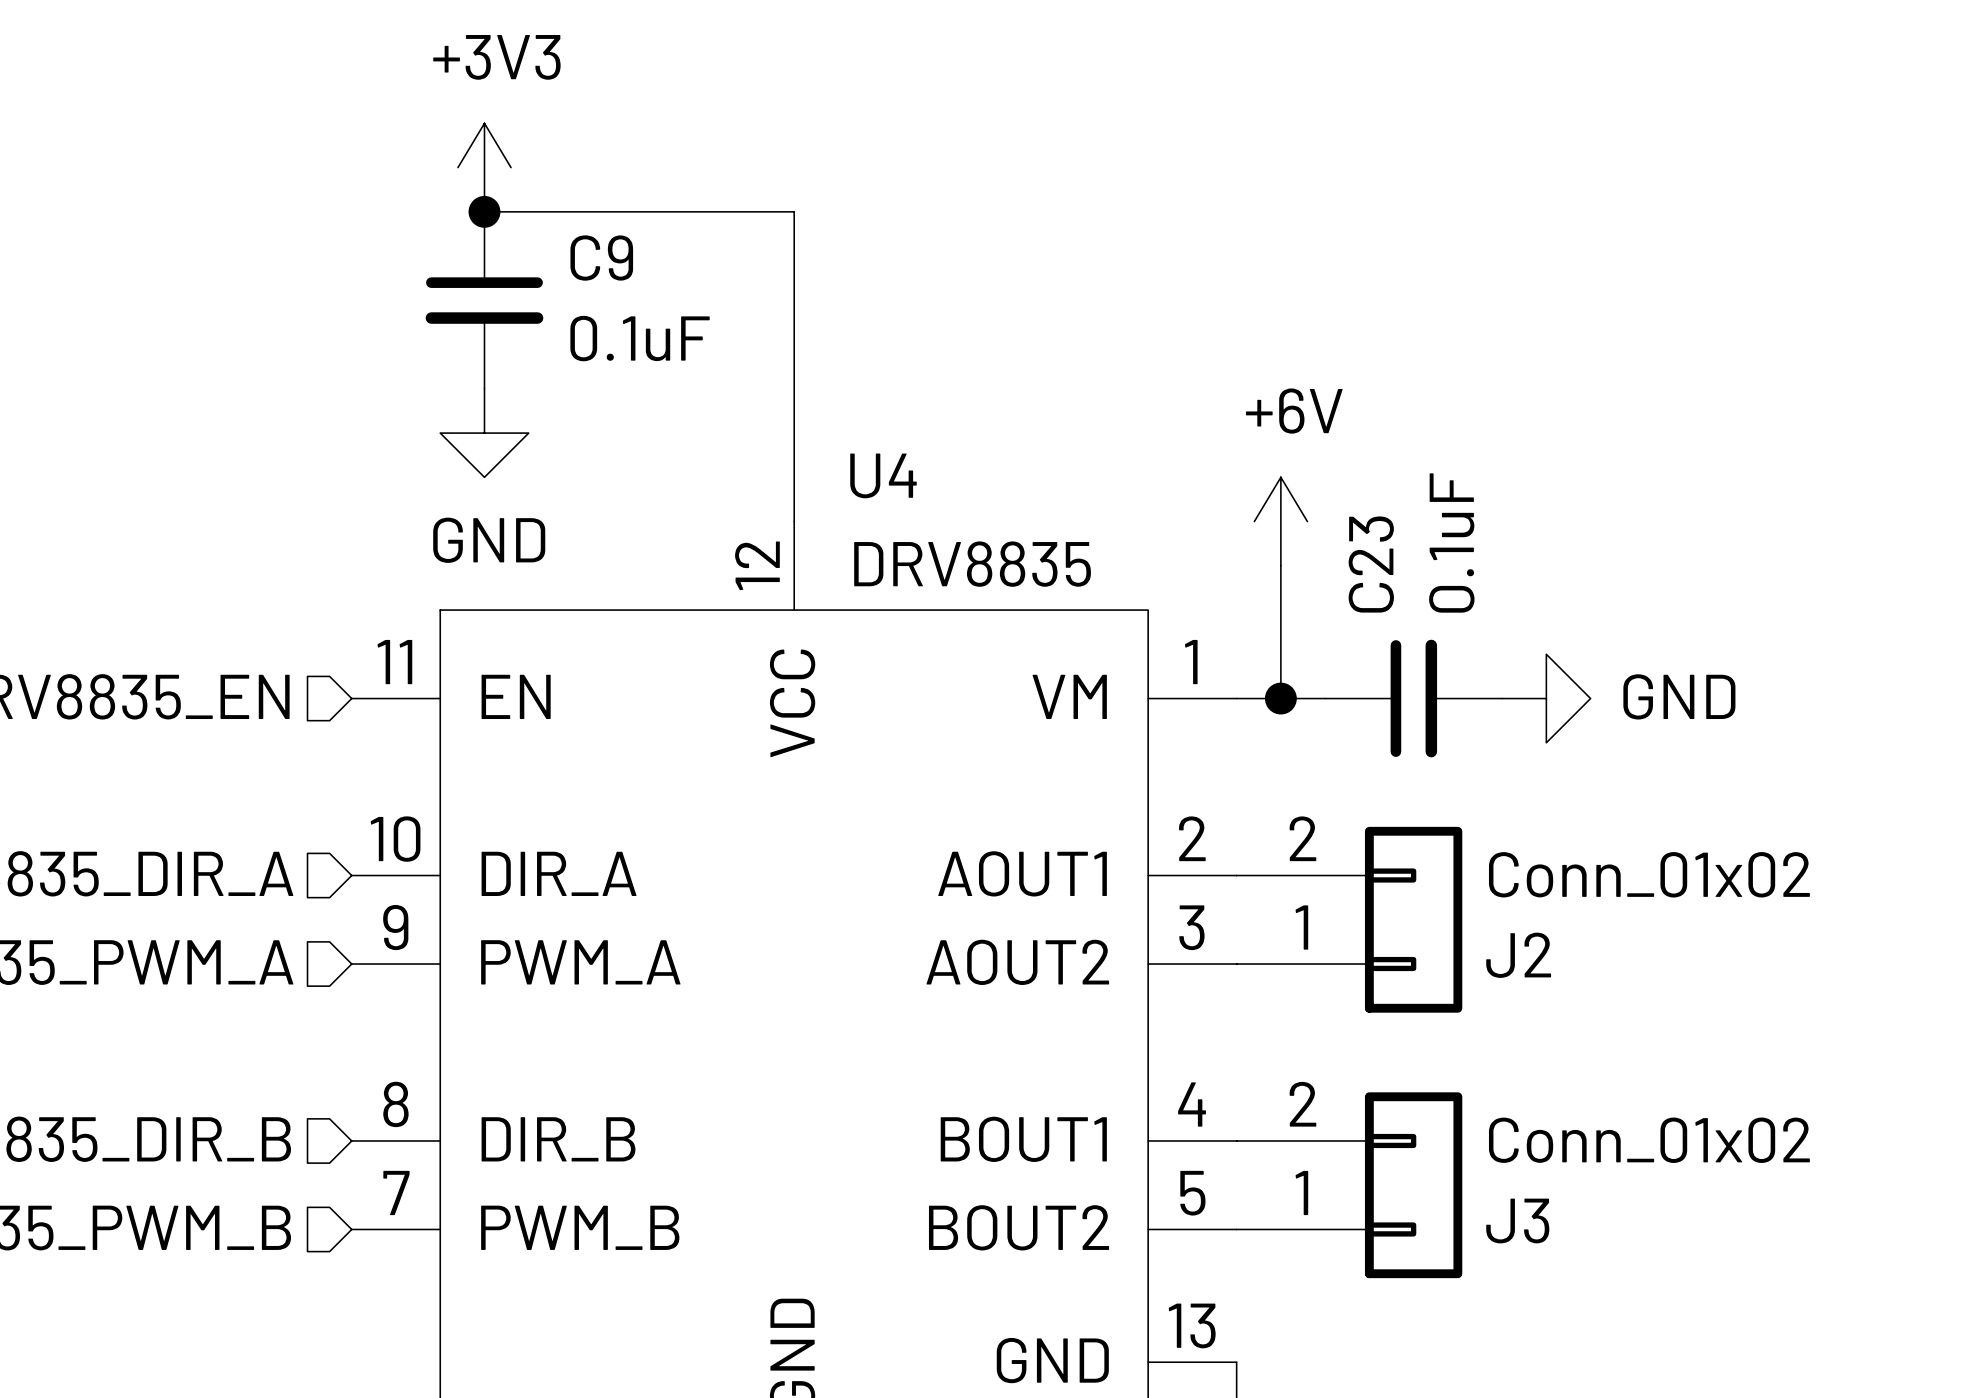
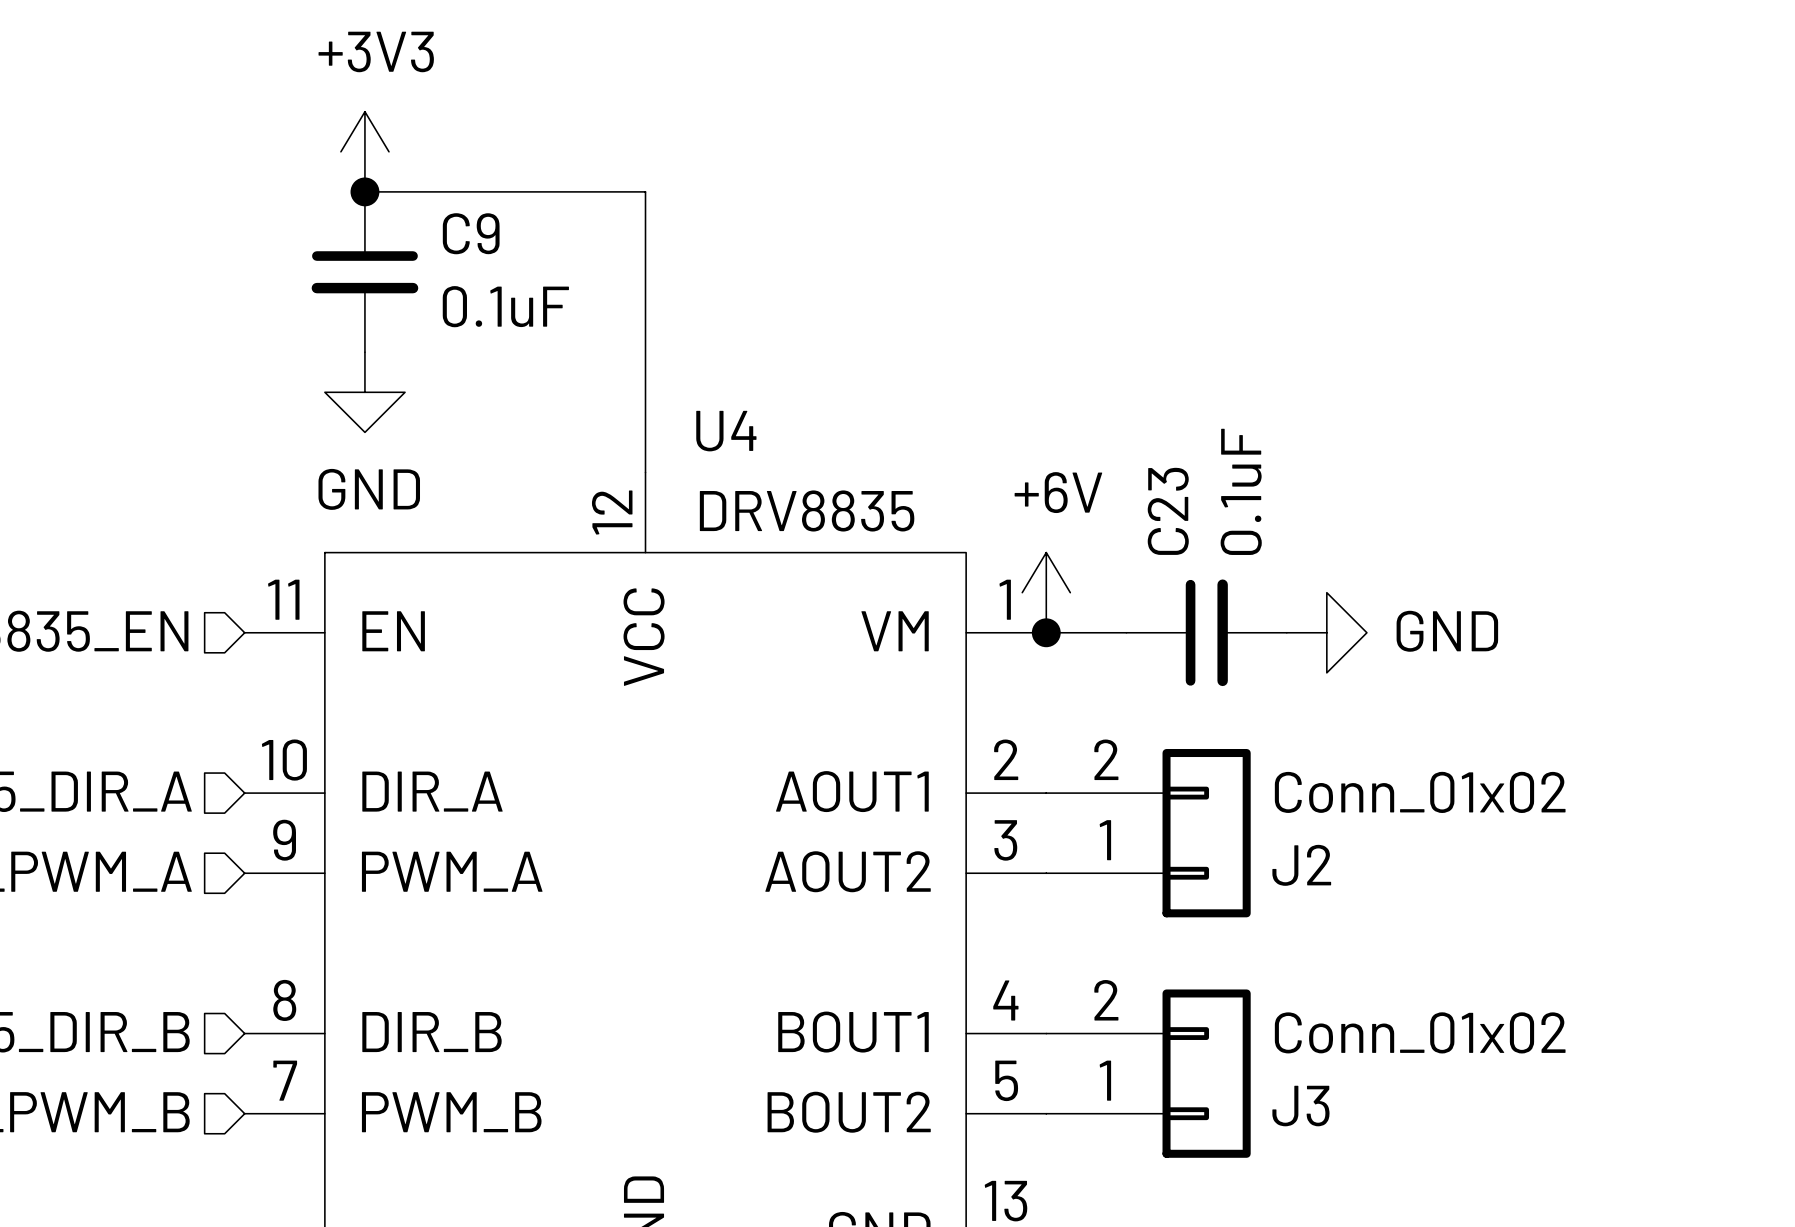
power symbol position: +6V (1280, 521) -> +6V (1046, 592)
wire: (1280, 565) (1280, 698) -> none
junction position: (1280, 698) -> (1046, 632)

